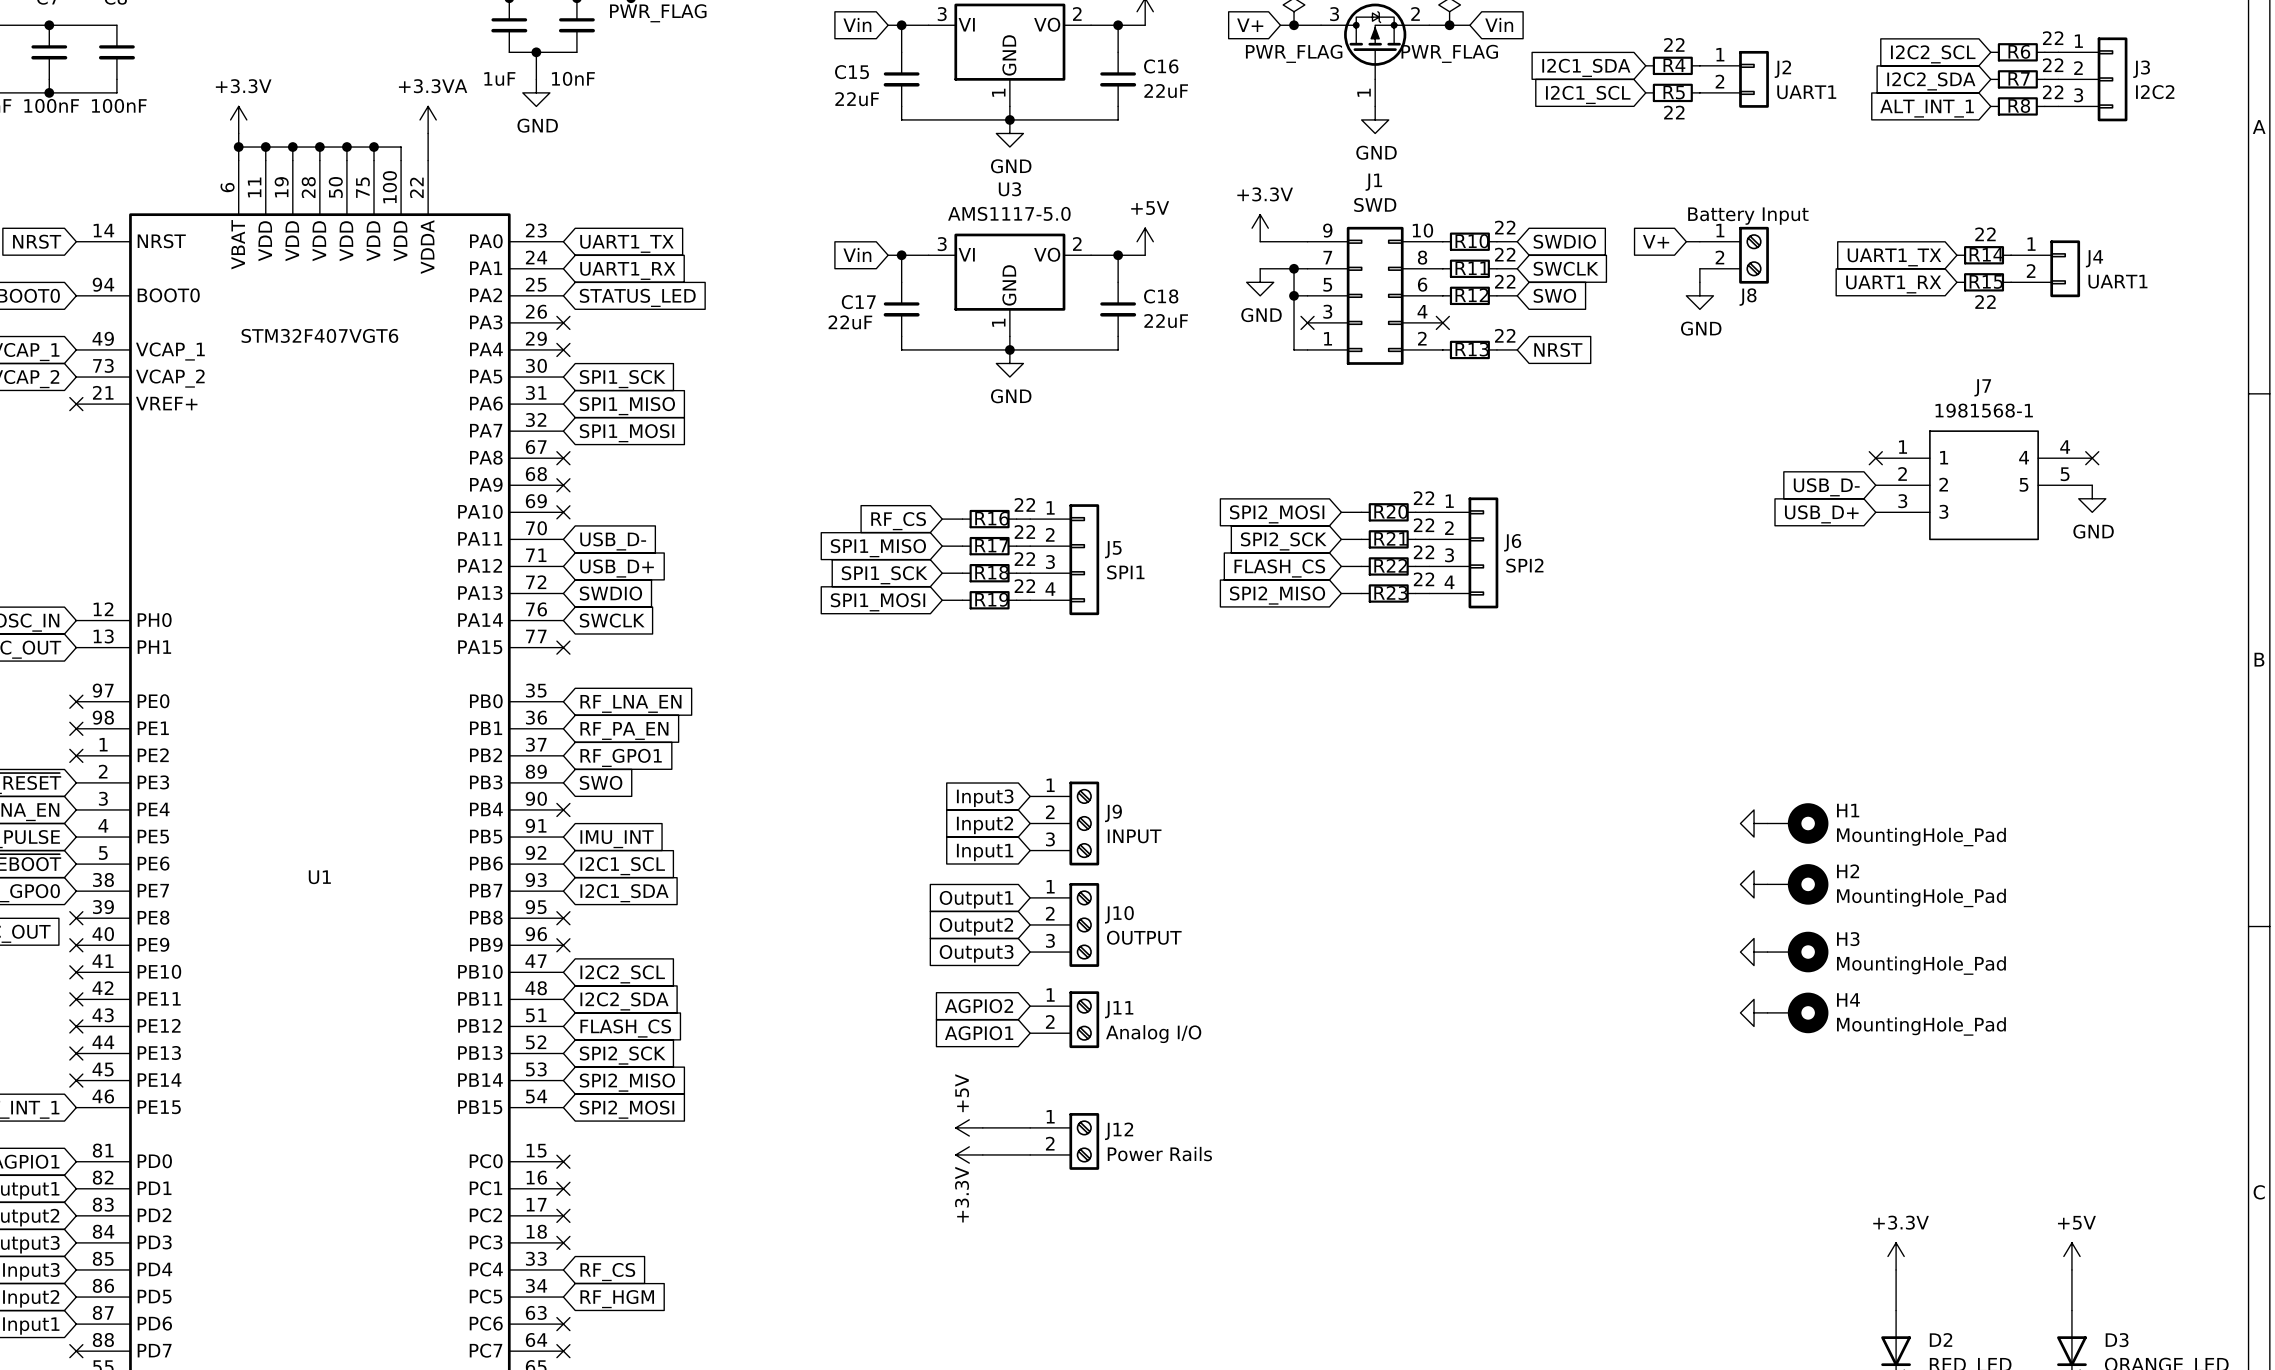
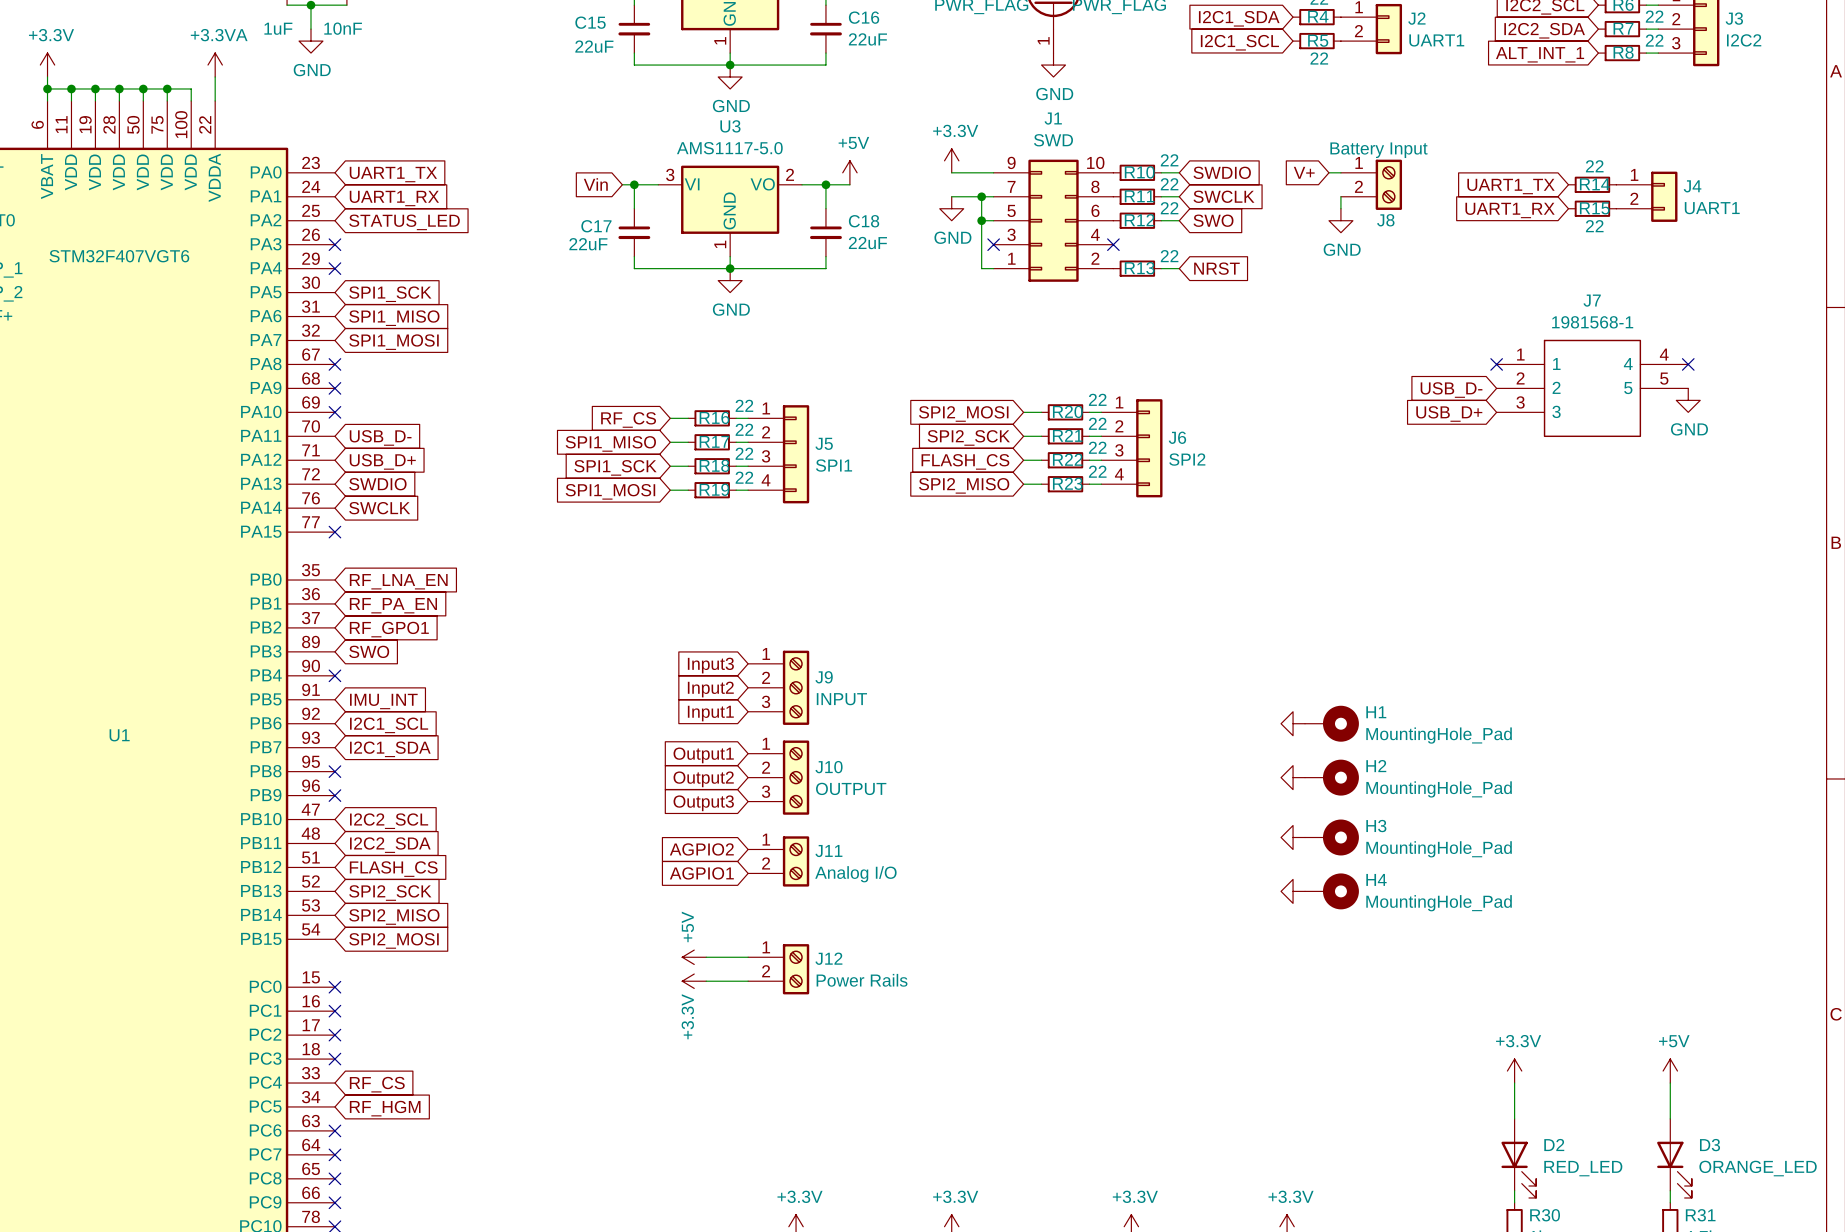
power symbol: (1754, 823) -> none
H1 position: (1797, 823) -> (1331, 723)
power symbol: none -> (1293, 723)
power symbol: (1754, 884) -> none
H2 position: (1797, 884) -> (1331, 777)
power symbol: none -> (1293, 777)
power symbol: (1754, 952) -> none
H3 position: (1797, 952) -> (1331, 837)
power symbol: none -> (1293, 837)
power symbol: (1754, 1012) -> none
H4 position: (1797, 1012) -> (1331, 891)
power symbol: none -> (1293, 891)

